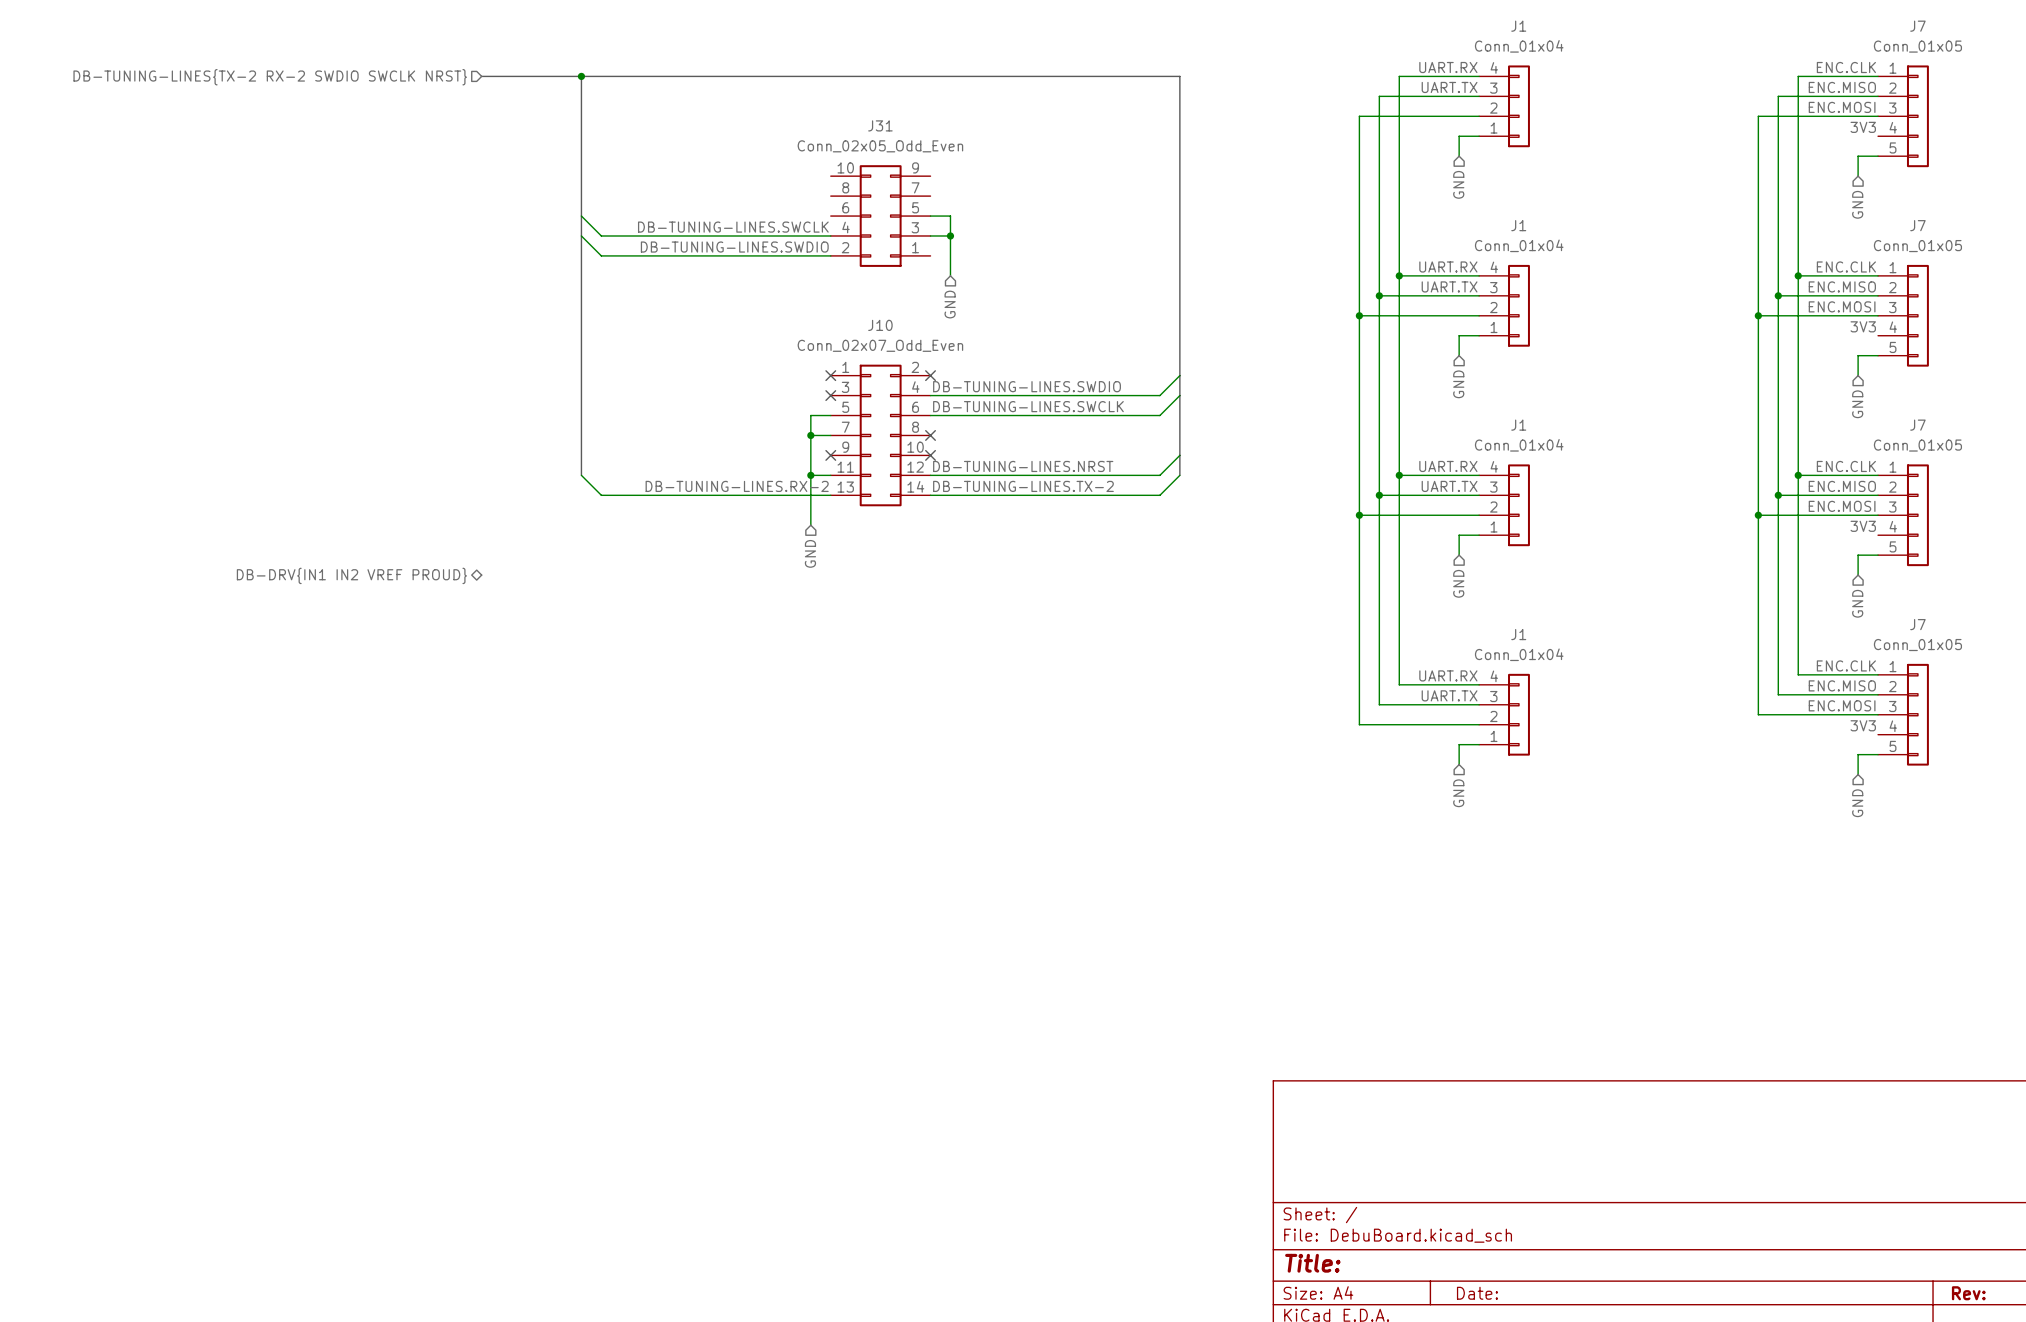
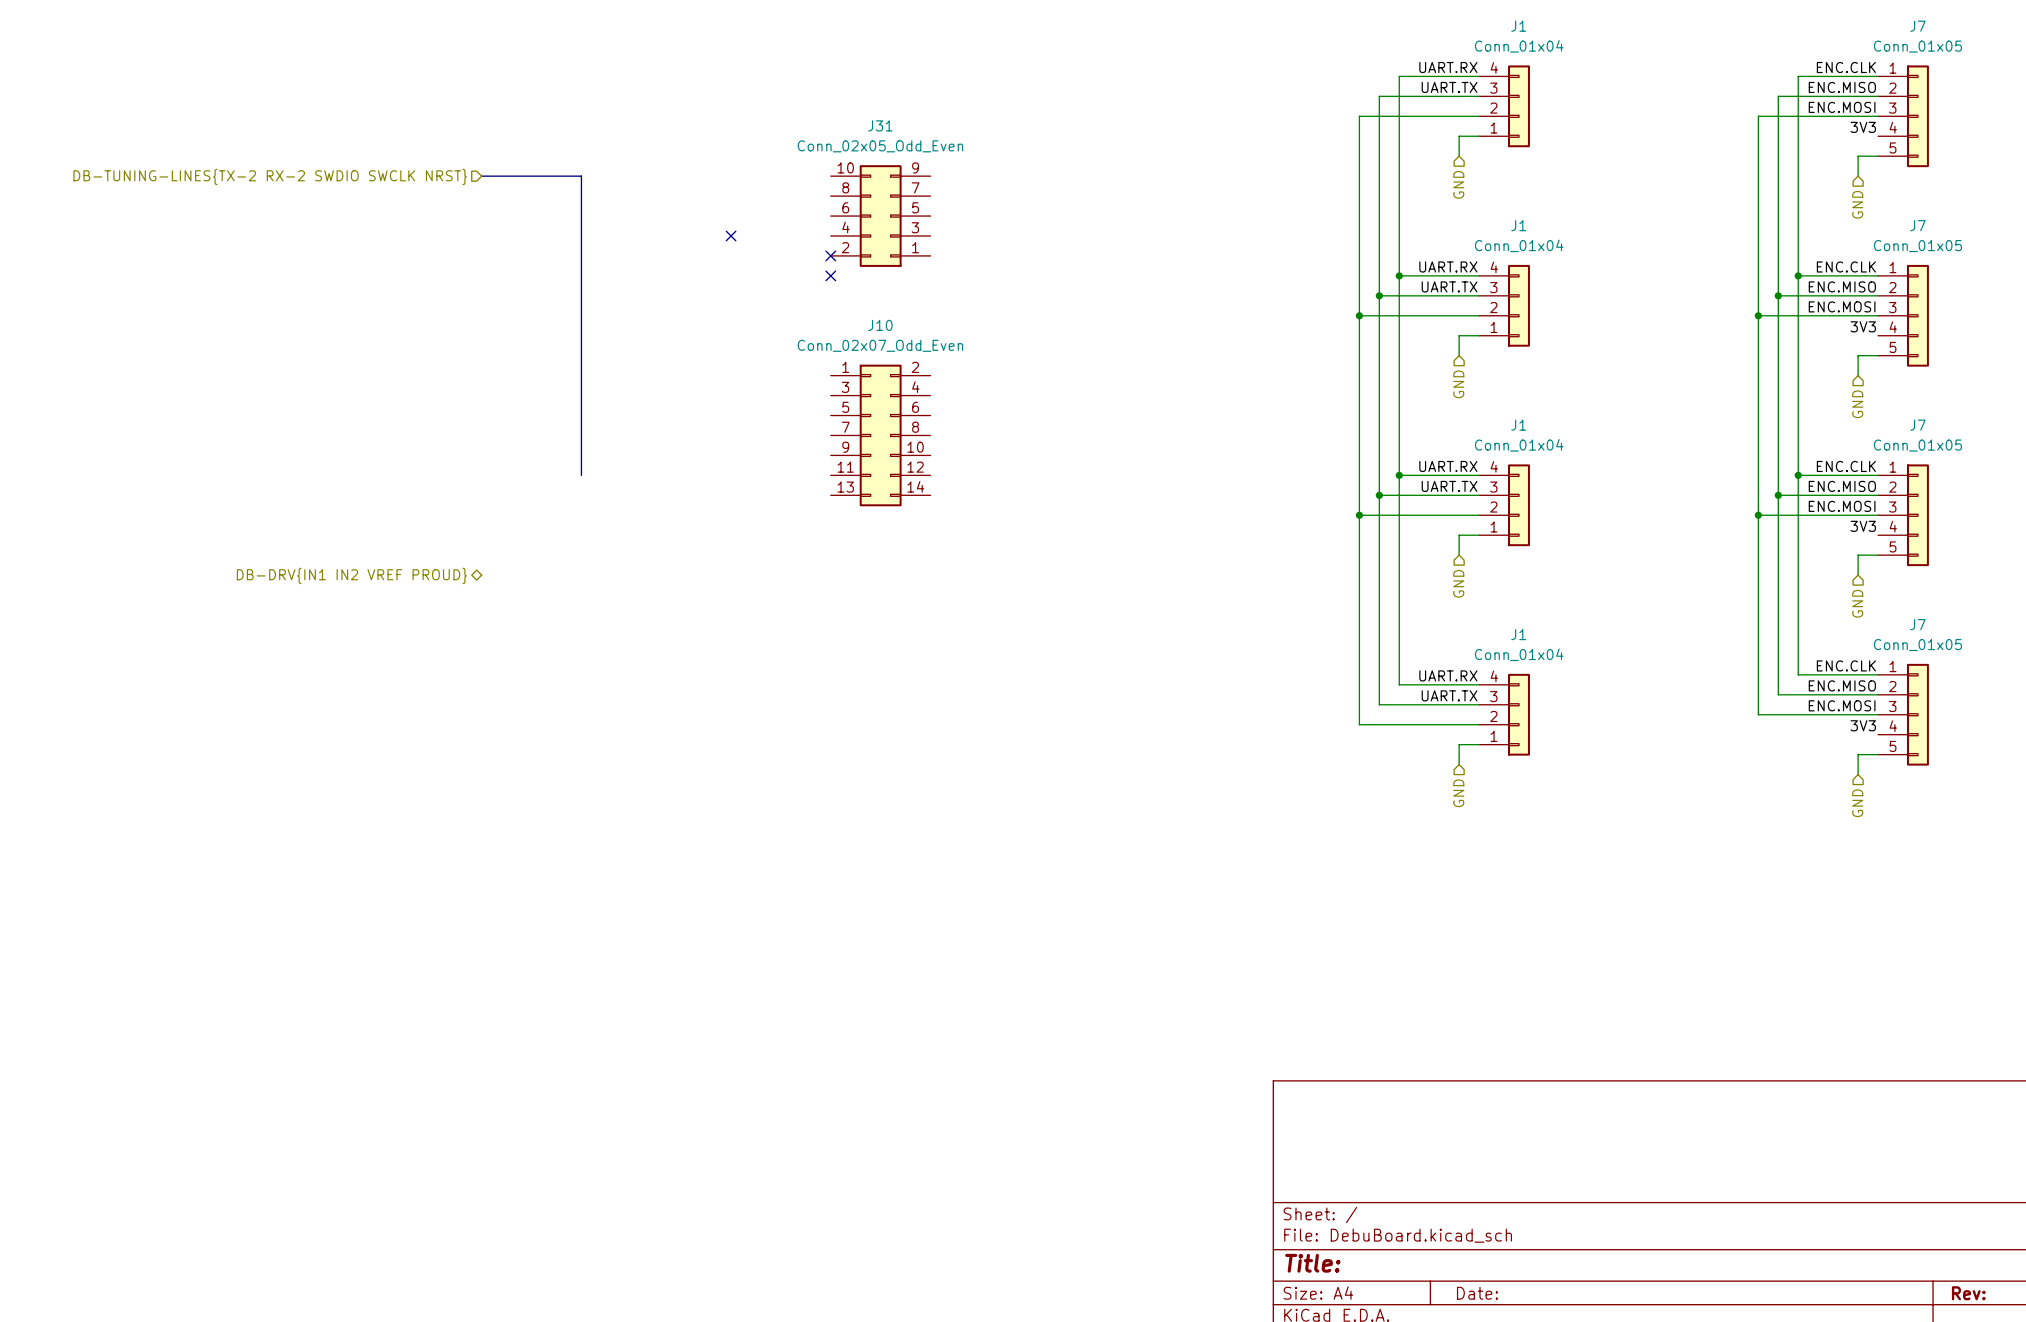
bus: (481, 76) (1179, 76) (1179, 475) -> none
bus: (581, 76) (581, 176) -> (481, 176) (581, 176)
junction: (581, 76) -> none
hierarchical label position: DB-TUNING-LINES{TX-2 RX-2 SWDIO SWCLK NRST} (270, 77) -> DB-TUNING-LINES{TX-2 RX-2 SWDIO SWCLK NRST} (270, 176)
wire: (581, 216) (601, 235) (830, 235) -> none
wire: (930, 216) (950, 216) (950, 275) -> none
label: DB-TUNING-LINES.SWCLK (733, 227) -> none
wire: (581, 235) (601, 255) (830, 255) -> none
no-connect mark: none -> (731, 235)
wire: (930, 235) (950, 235) -> none
junction: (950, 235) -> none
label: DB-TUNING-LINES.SWDIO (734, 247) -> none
no-connect mark: none -> (830, 255)
no-connect mark: none -> (830, 275)
hierarchical label: GND (950, 304) -> none
no-connect mark: (830, 375) -> none
no-connect mark: (930, 375) -> none
wire: (1179, 375) (1159, 395) (930, 395) -> none
label: DB-TUNING-LINES.SWDIO (1027, 386) -> none
no-connect mark: (830, 395) -> none
wire: (1179, 395) (1159, 415) (930, 415) -> none
label: DB-TUNING-LINES.SWCLK (1028, 406) -> none
wire: (830, 415) (810, 415) (810, 525) -> none
wire: (810, 435) (830, 435) -> none
junction: (810, 435) -> none
no-connect mark: (930, 435) -> none
no-connect mark: (830, 455) -> none
no-connect mark: (930, 455) -> none
wire: (1179, 455) (1159, 475) (930, 475) -> none
label: DB-TUNING-LINES.NRST (1023, 466) -> none
wire: (581, 475) (601, 495) (830, 495) -> none
wire: (810, 475) (830, 475) -> none
junction: (810, 475) -> none
wire: (1179, 475) (1159, 495) (930, 495) -> none
label: DB-TUNING-LINES.RX-2 (737, 486) -> none
label: DB-TUNING-LINES.TX-2 (1023, 486) -> none
hierarchical label: GND (810, 553) -> none

